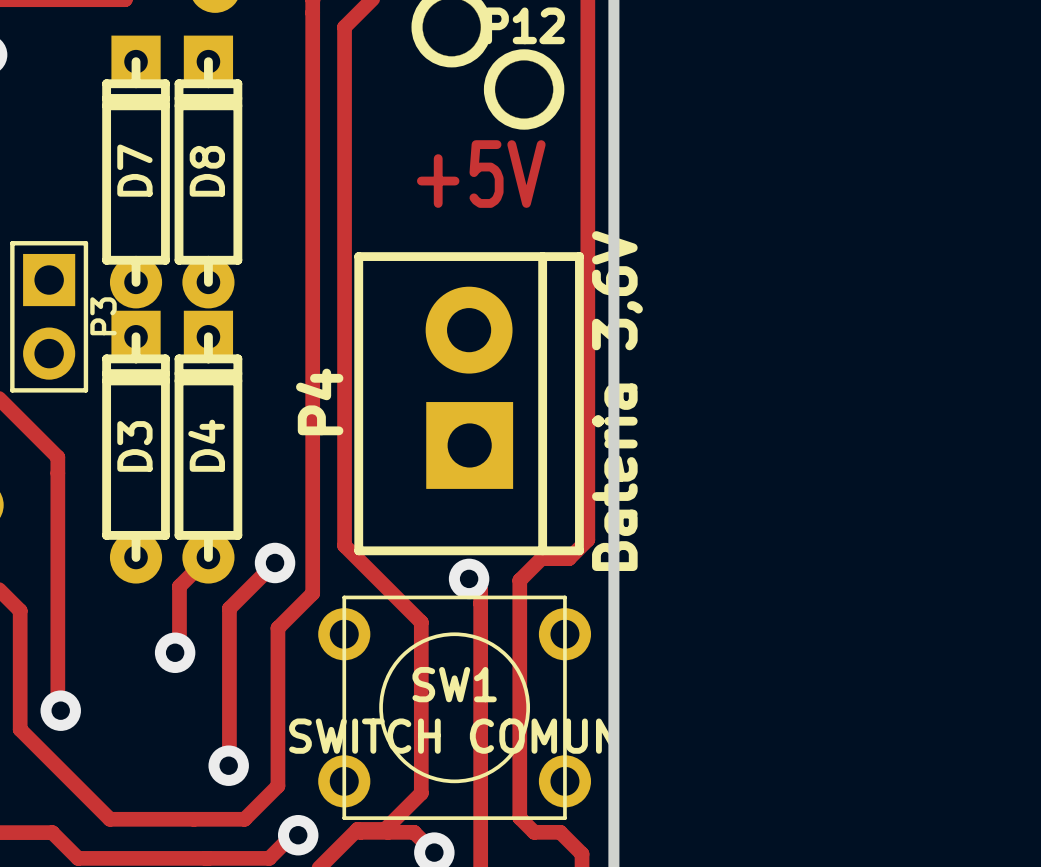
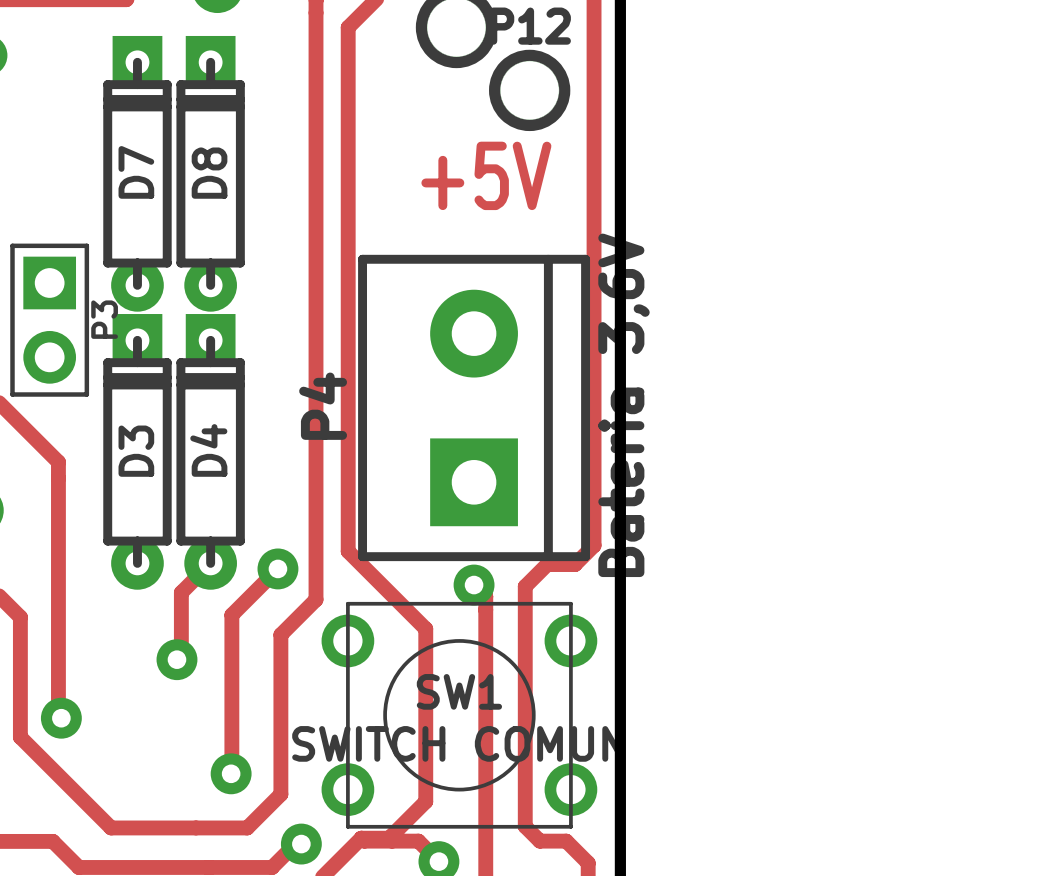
P4 footprint: [354, 252, 584, 556] -> [358, 254, 591, 562]

